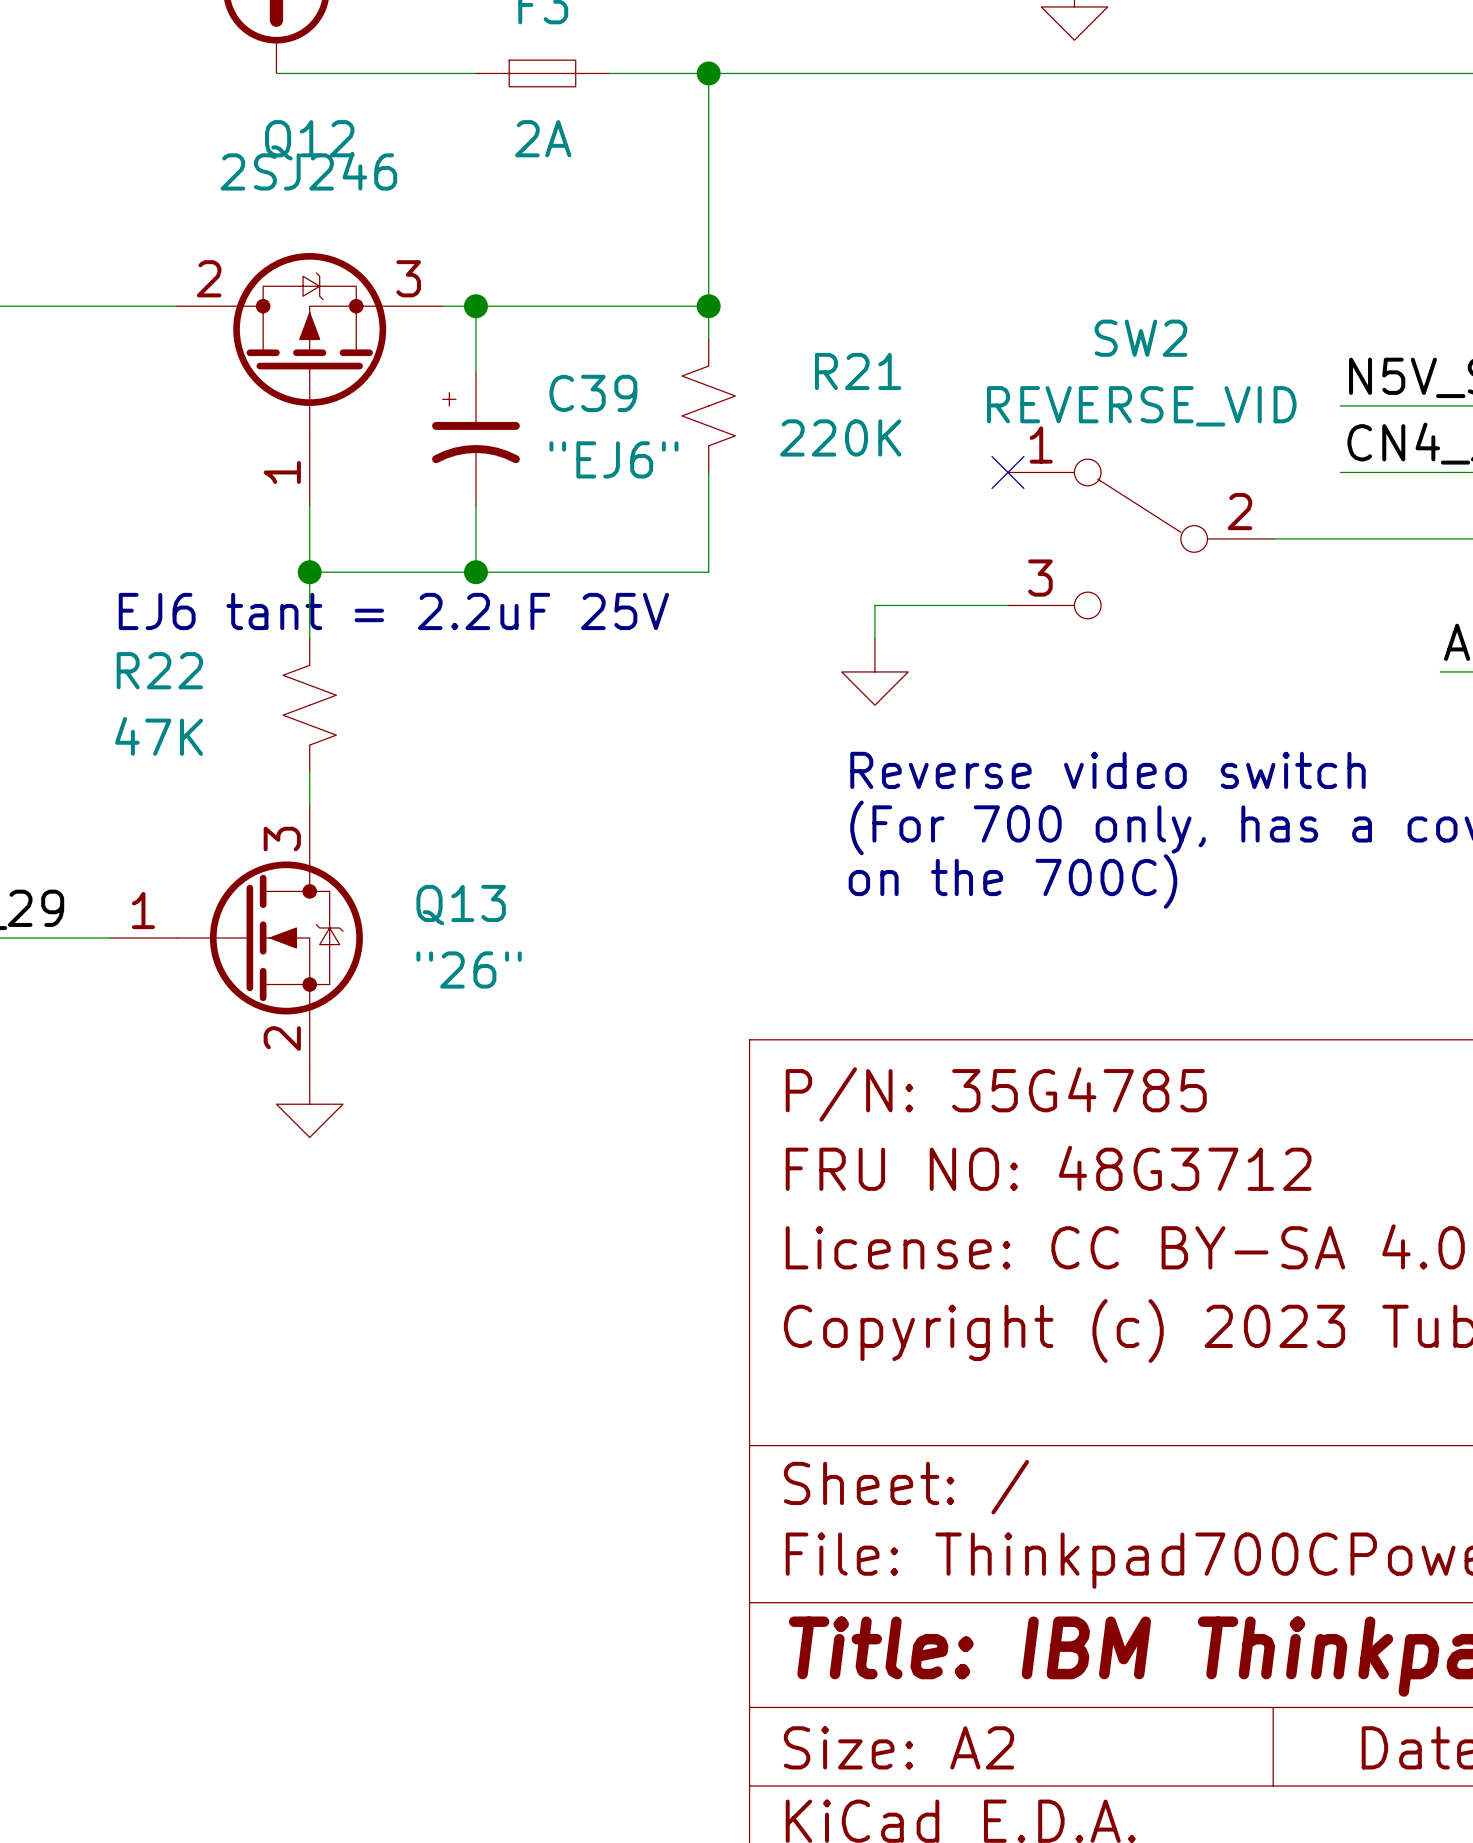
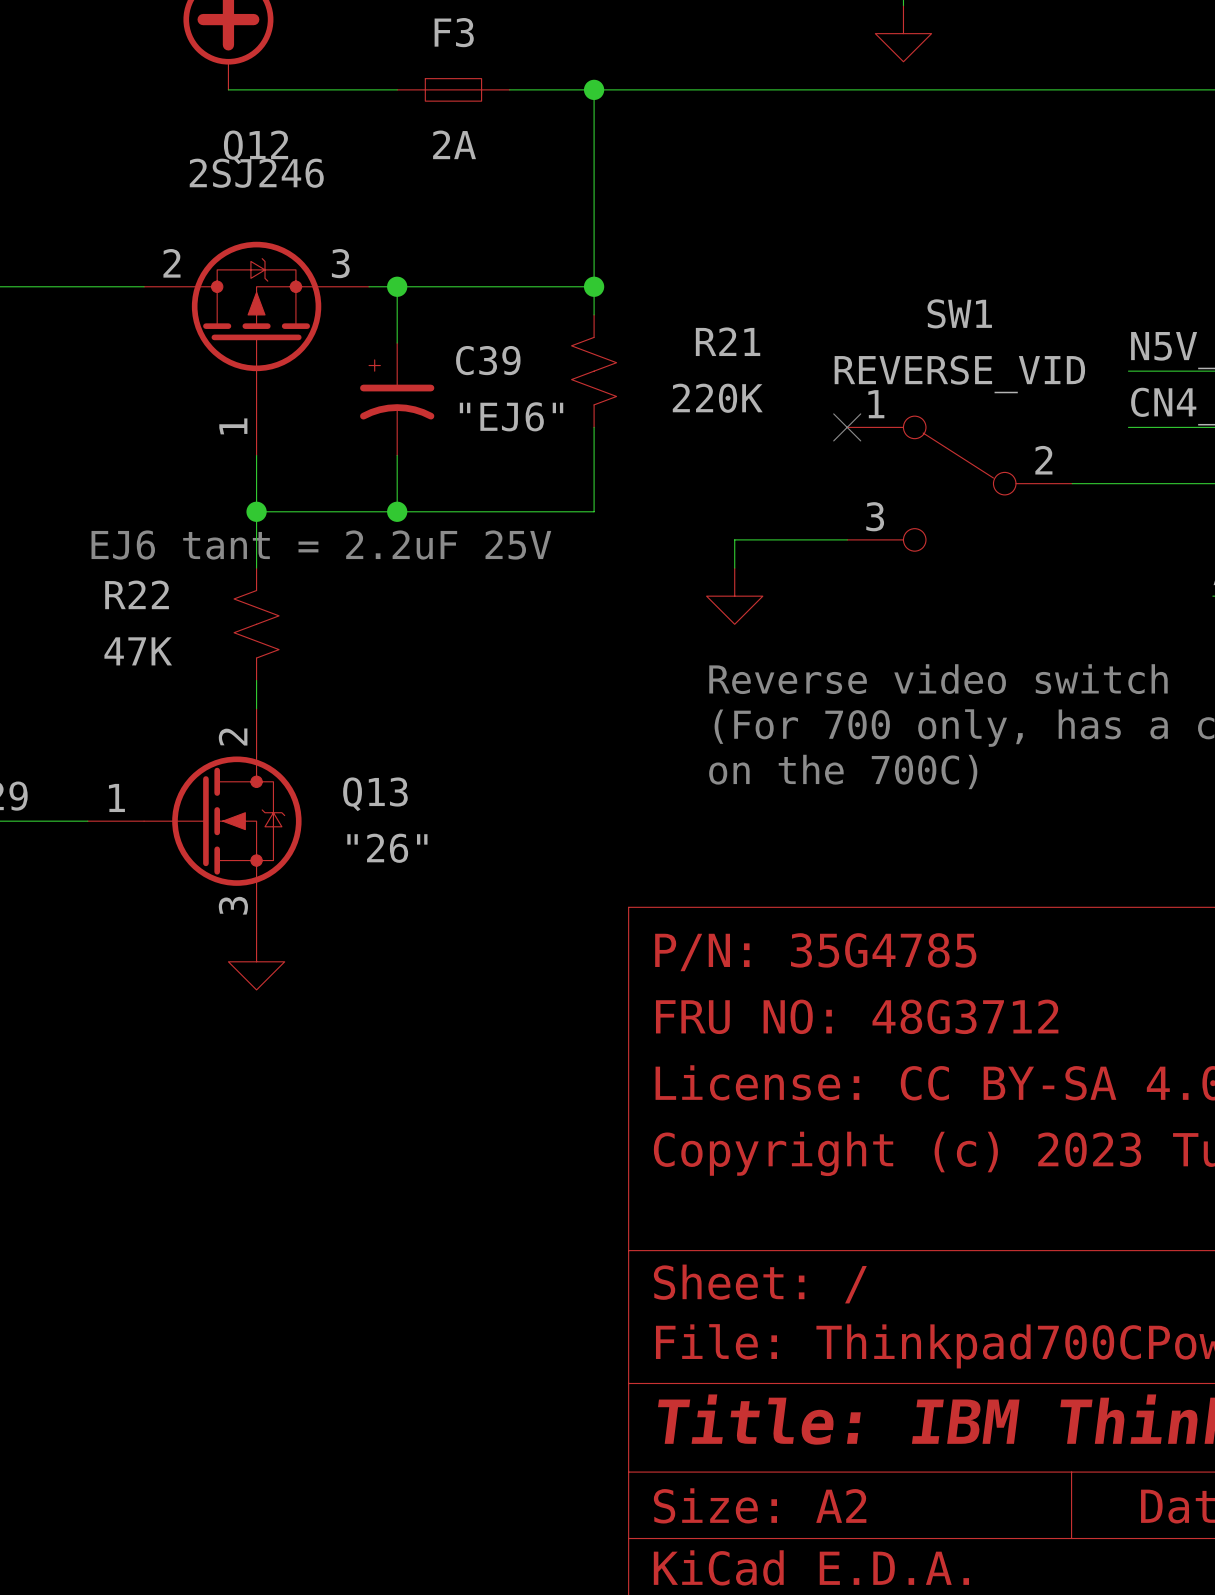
SW2 name: SW2 (1140, 338) -> SW1 (959, 313)
Q13 pin number: 3 (282, 839) -> 2 (233, 737)
Q13 pin number: 2 (282, 1038) -> 3 (233, 905)

